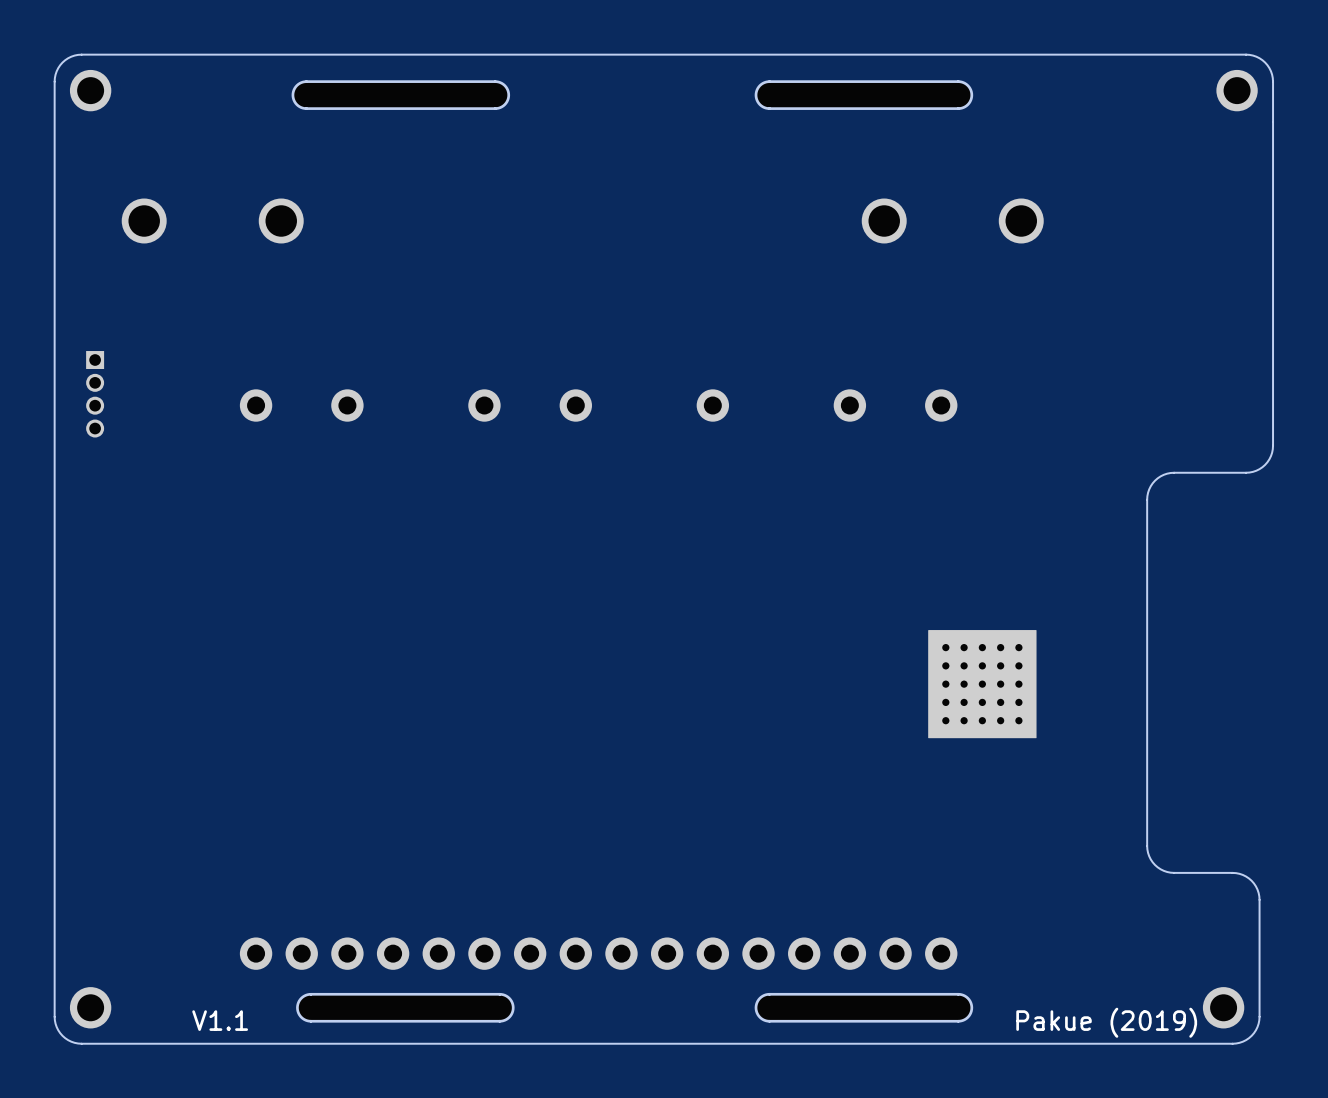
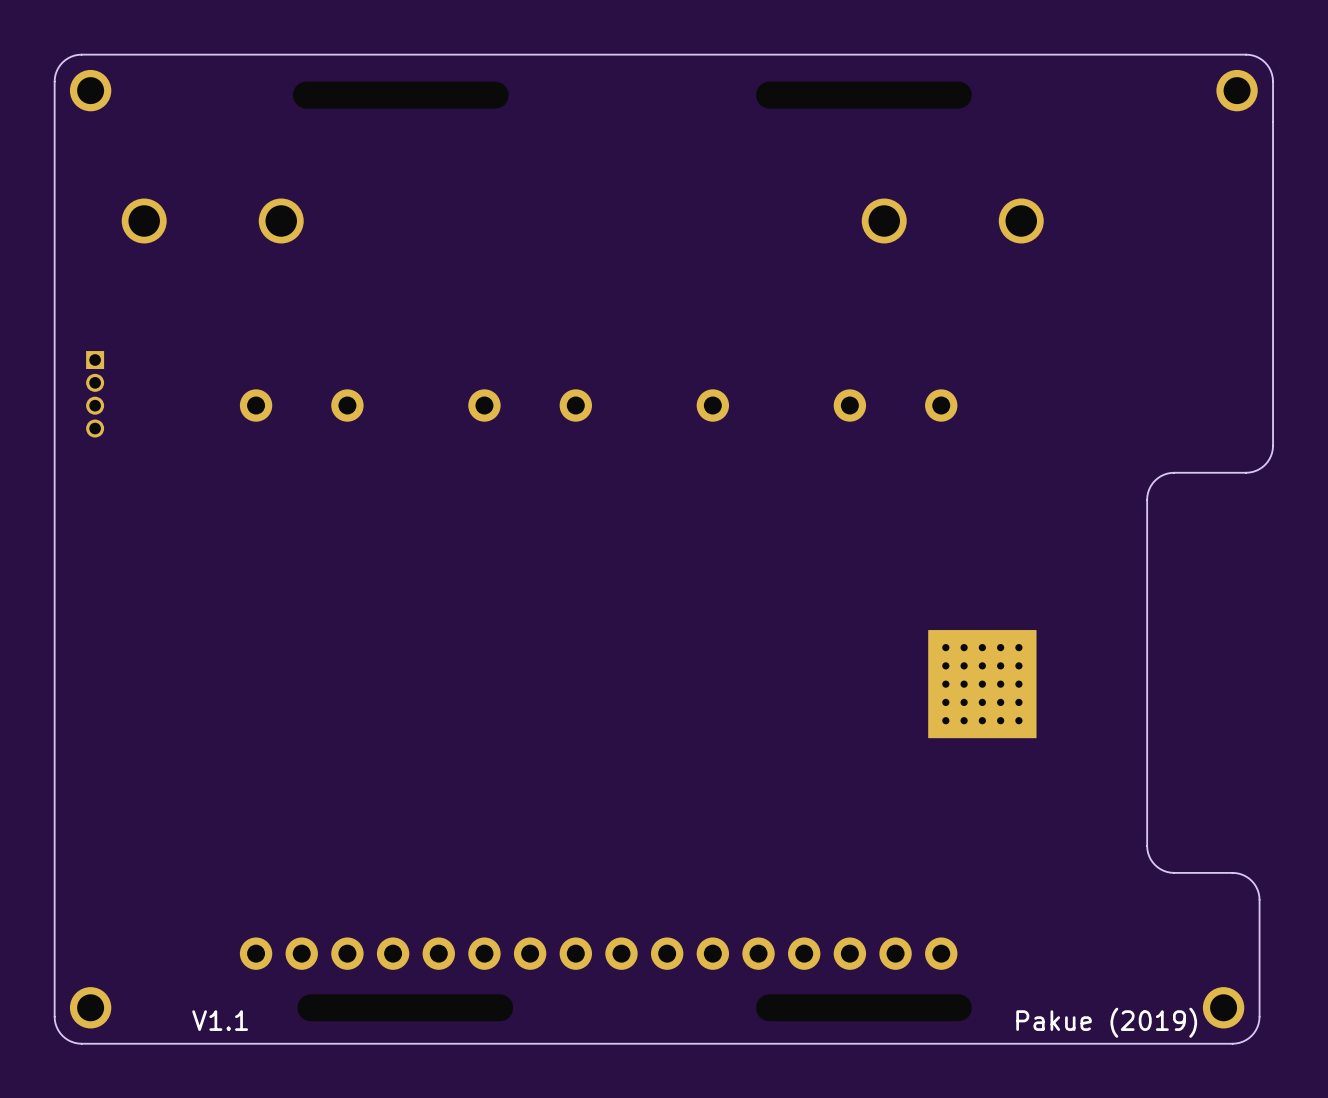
part footprint: [291, 80, 511, 110] -> [292, 81, 509, 109]
part footprint: [754, 80, 974, 110] -> [756, 81, 972, 109]
part footprint: [296, 992, 515, 1023] -> [297, 994, 514, 1022]
part footprint: [754, 992, 974, 1023] -> [756, 994, 972, 1022]

